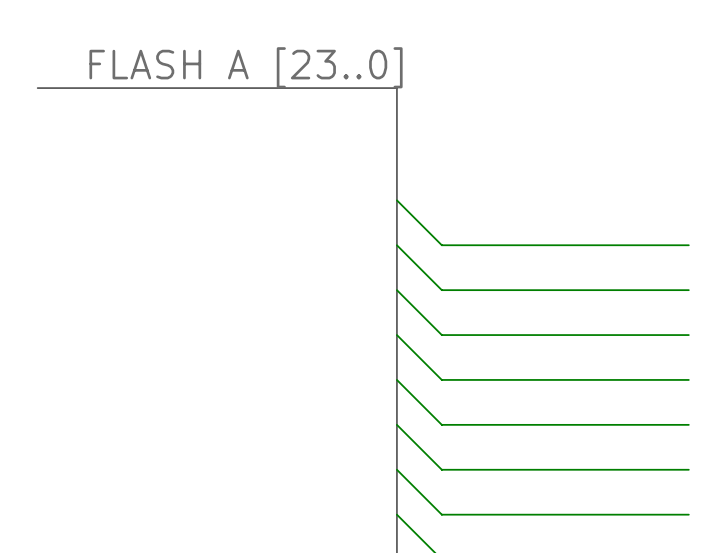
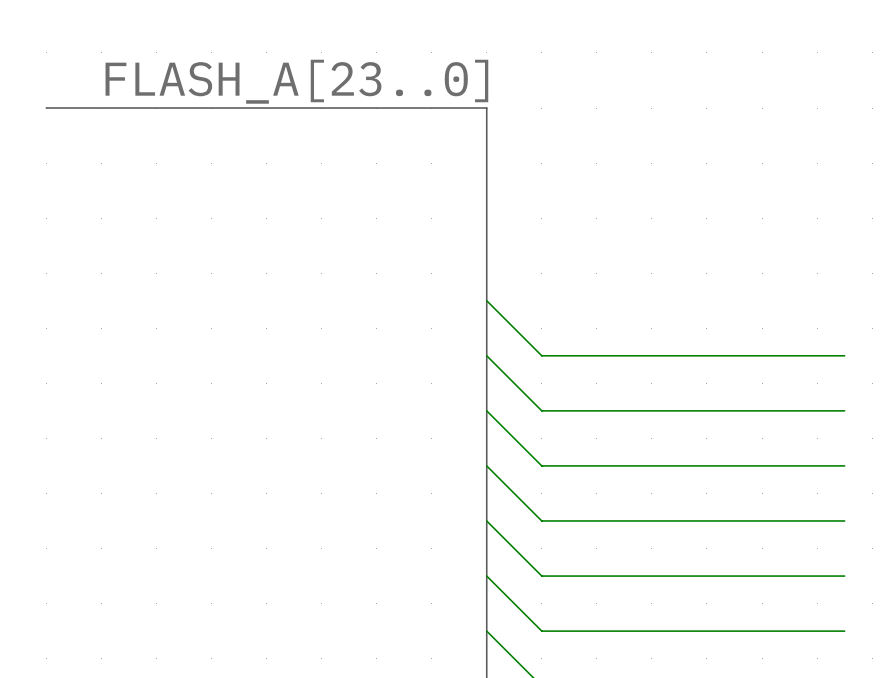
label: FLASH A [23..0] (246, 67) -> FLASH_A[23..0] (296, 81)
wire: (396, 200) (441, 245) (688, 245) -> none

